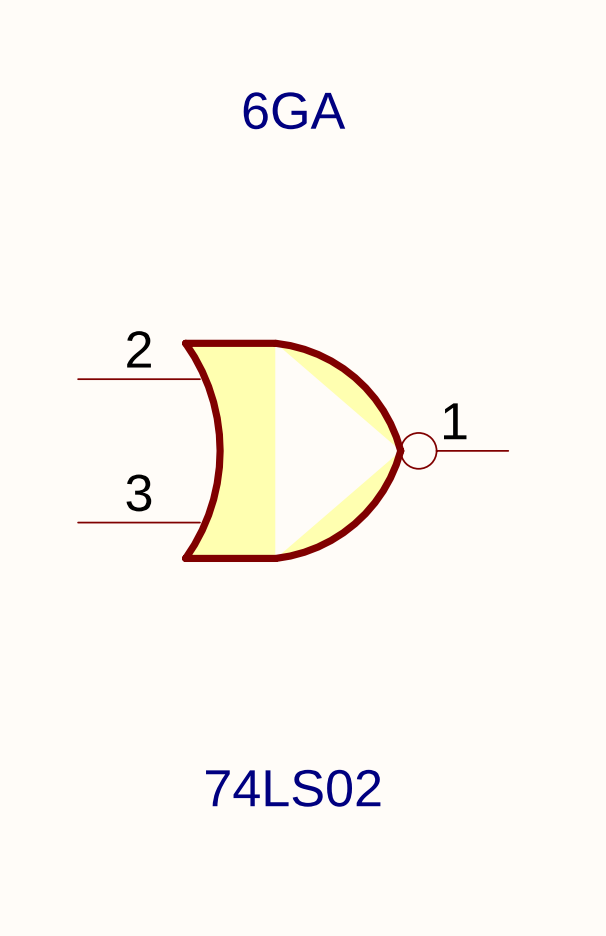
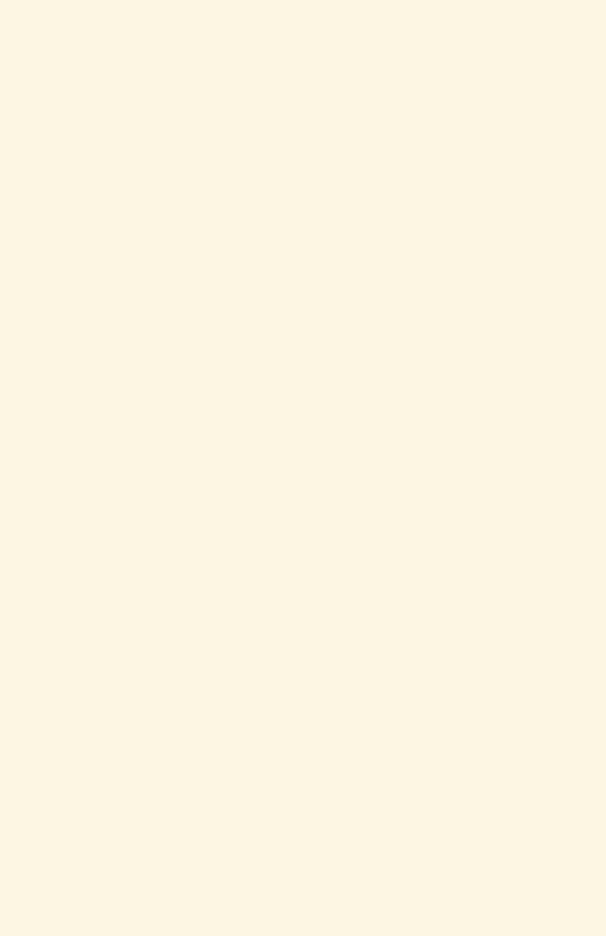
6GA: 74LS02 (293, 450) -> none

